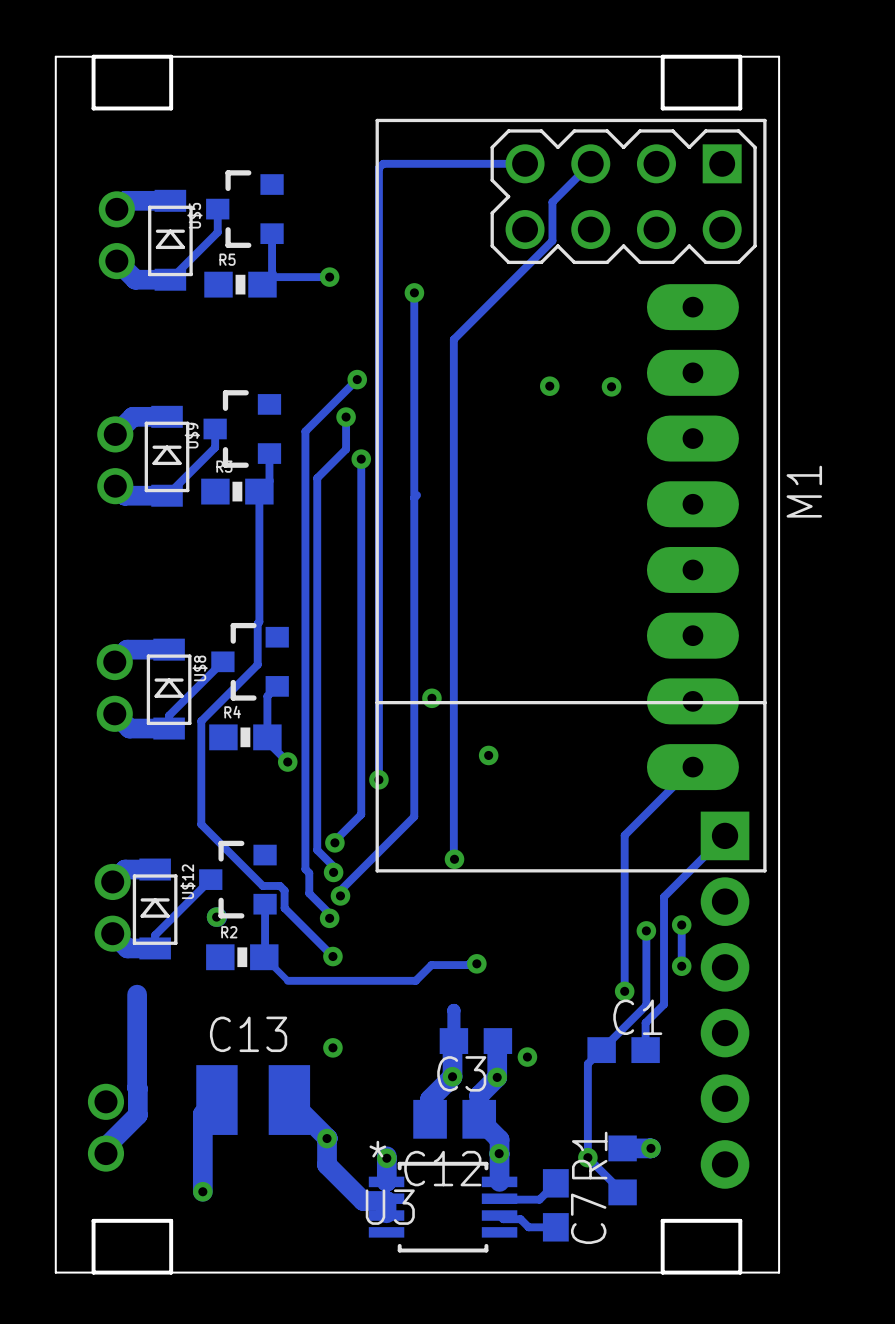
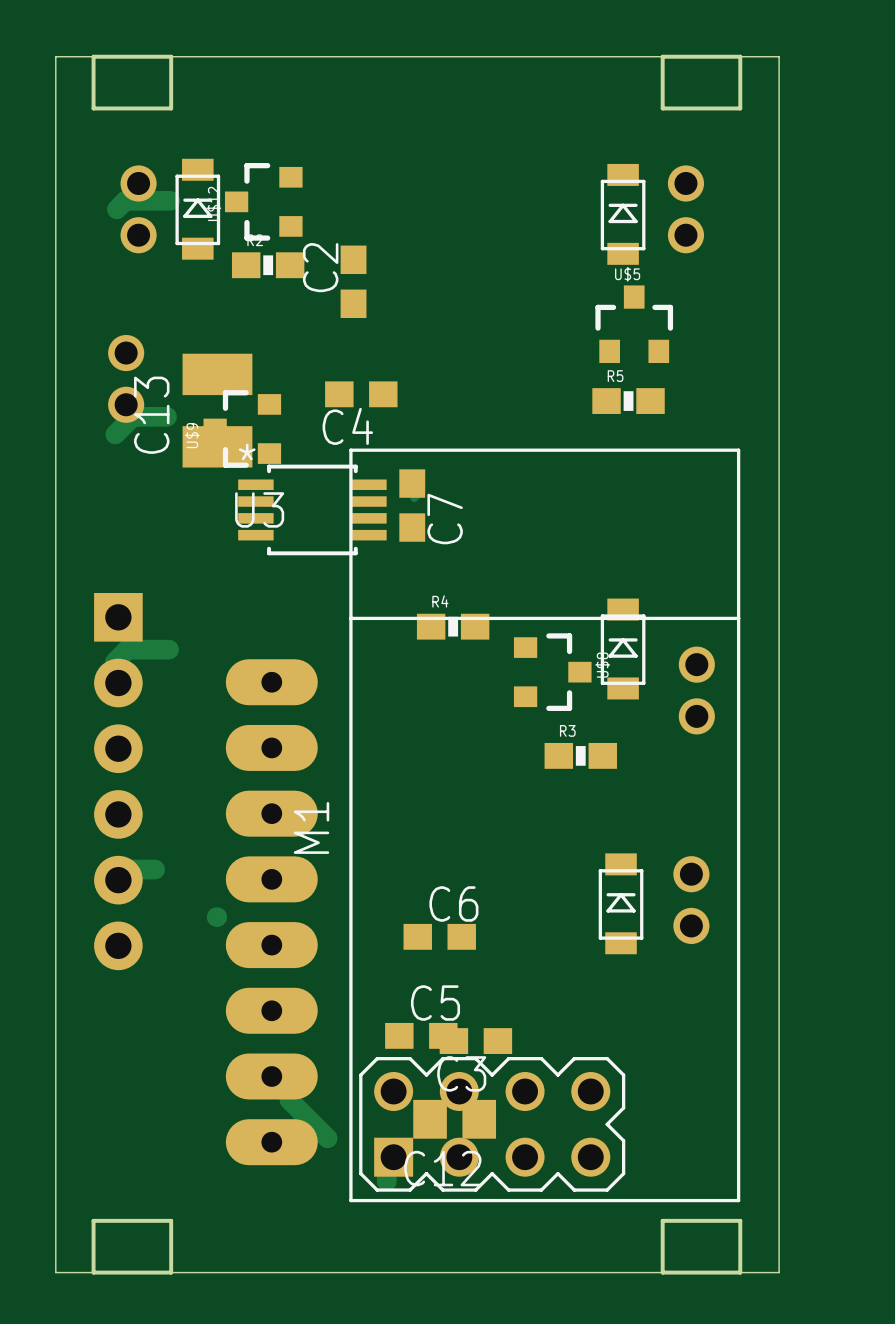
track: (525, 163) (383, 163) (378, 168) (378, 781) -> none
track: (590, 163) (552, 202) (552, 240) (453, 339) (454, 859) -> none
track: (217, 209) (217, 232) (170, 279) (135, 279) (116, 261) -> none
U$5 rotation: 0° (244, 209) -> 90° clockwise (634, 324)
U$5 position: (244, 209) -> (634, 324)
part: none -> (685, 209)
part: none -> (623, 214)
track: (272, 233) (272, 275) (262, 284) -> none
part position: (116, 235) -> (138, 209)
part position: (170, 240) -> (197, 209)
track: (329, 277) (270, 277) -> none
via: (329, 277) -> none
C2: none -> (353, 281)
R5 position: (240, 284) -> (628, 401)
track: (414, 292) (412, 292) (414, 294) (414, 816) (340, 890) (340, 895) -> none
via: (414, 292) -> none
part: none -> (126, 378)
track: (357, 379) (305, 431) (305, 869) (309, 873) (309, 893) (329, 913) (329, 918) -> none
via: (357, 379) -> none
via: (549, 386) -> none
via: (611, 386) -> none
C4: none -> (361, 394)
track: (346, 417) (346, 449) (317, 478) (317, 850) (333, 866) (333, 872) -> none
via: (346, 417) -> none
track: (215, 428) (215, 447) (167, 495) (124, 495) (115, 486) -> none
track: (269, 453) (269, 481) (259, 491) (257, 664) (201, 721) (201, 824) (262, 885) (279, 885) (284, 890) (284, 908) (332, 956) -> none
part: (167, 456) -> none
track: (361, 459) (361, 814) (334, 842) -> none
via: (361, 459) -> none
part: (115, 460) -> none
R3 position: (237, 491) -> (580, 755)
M1 rotation: 0° (571, 495) -> 180° (544, 825)
part position: (692, 537) -> (271, 912)
part: none -> (623, 649)
track: (222, 661) (169, 715) (169, 728) (129, 728) (114, 713) -> none
U$8 rotation: 0° (250, 661) -> 180° (552, 672)
U$8 position: (250, 661) -> (552, 672)
track: (277, 686) (267, 696) (267, 741) (287, 762) -> none
part: (114, 687) -> none
part: (169, 689) -> none
part: none -> (696, 690)
via: (431, 698) -> none
R4 position: (245, 737) -> (453, 626)
via: (488, 755) -> none
via: (287, 762) -> none
track: (692, 767) (624, 835) (624, 991) -> none
via: (378, 779) -> none
track: (725, 835) (664, 896) (664, 1004) (645, 1022) (645, 1050) -> none
via: (334, 842) -> none
via: (454, 859) -> none
via: (333, 872) -> none
track: (210, 879) (155, 935) (155, 948) (127, 948) (112, 933) -> none
U$12 position: (237, 879) -> (263, 201)
via: (340, 895) -> none
part: none -> (691, 900)
part: none -> (621, 903)
track: (265, 904) (264, 957) (287, 980) (415, 980) (431, 965) (476, 963) -> none
part: (112, 907) -> none
part: (155, 908) -> none
via: (216, 917) -> none
via: (329, 918) -> none
track: (681, 924) (681, 961) (677, 966) (681, 966) -> none
via: (681, 924) -> none
track: (646, 930) (646, 1005) (587, 1063) (587, 1157) (622, 1192) -> none
via: (646, 930) -> none
C6: none -> (439, 936)
via: (332, 956) -> none
R2 position: (242, 957) -> (268, 265)
via: (476, 963) -> none
via: (681, 966) -> none
via: (624, 991) -> none
track: (137, 994) (137, 1115) (105, 1146) (105, 1153) -> none
part position: (725, 1000) -> (118, 781)
track: (453, 1010) (452, 1076) (430, 1099) (430, 1119) -> none
C13 name position: C13 (248, 1034) -> C13 (151, 415)
C5: none -> (421, 1035)
track: (497, 1041) (497, 1077) (479, 1095) (479, 1119) (499, 1139) (499, 1181) -> none
via: (332, 1047) -> none
C1: (623, 1050) -> none
via: (527, 1057) -> none
via: (452, 1076) -> none
via: (497, 1077) -> none
track: (216, 1100) (202, 1114) (202, 1191) -> none
C13 rotation: 0° (253, 1100) -> 90° clockwise (217, 410)
C13 position: (253, 1100) -> (217, 410)
part: (105, 1127) -> none
track: (327, 1138) (327, 1164) (363, 1200) (386, 1200) (386, 1213) -> none
via: (327, 1138) -> none
via: (650, 1148) -> none
via: (499, 1153) -> none
via: (587, 1157) -> none
via: (386, 1158) -> none
R1: (622, 1170) -> none
track: (555, 1183) (539, 1199) (499, 1199) -> none
via: (202, 1191) -> none
C7 position: (555, 1205) -> (412, 505)
U3 position: (443, 1207) -> (312, 509)
track: (499, 1215) (503, 1219) (520, 1219) (528, 1227) (555, 1227) -> none

